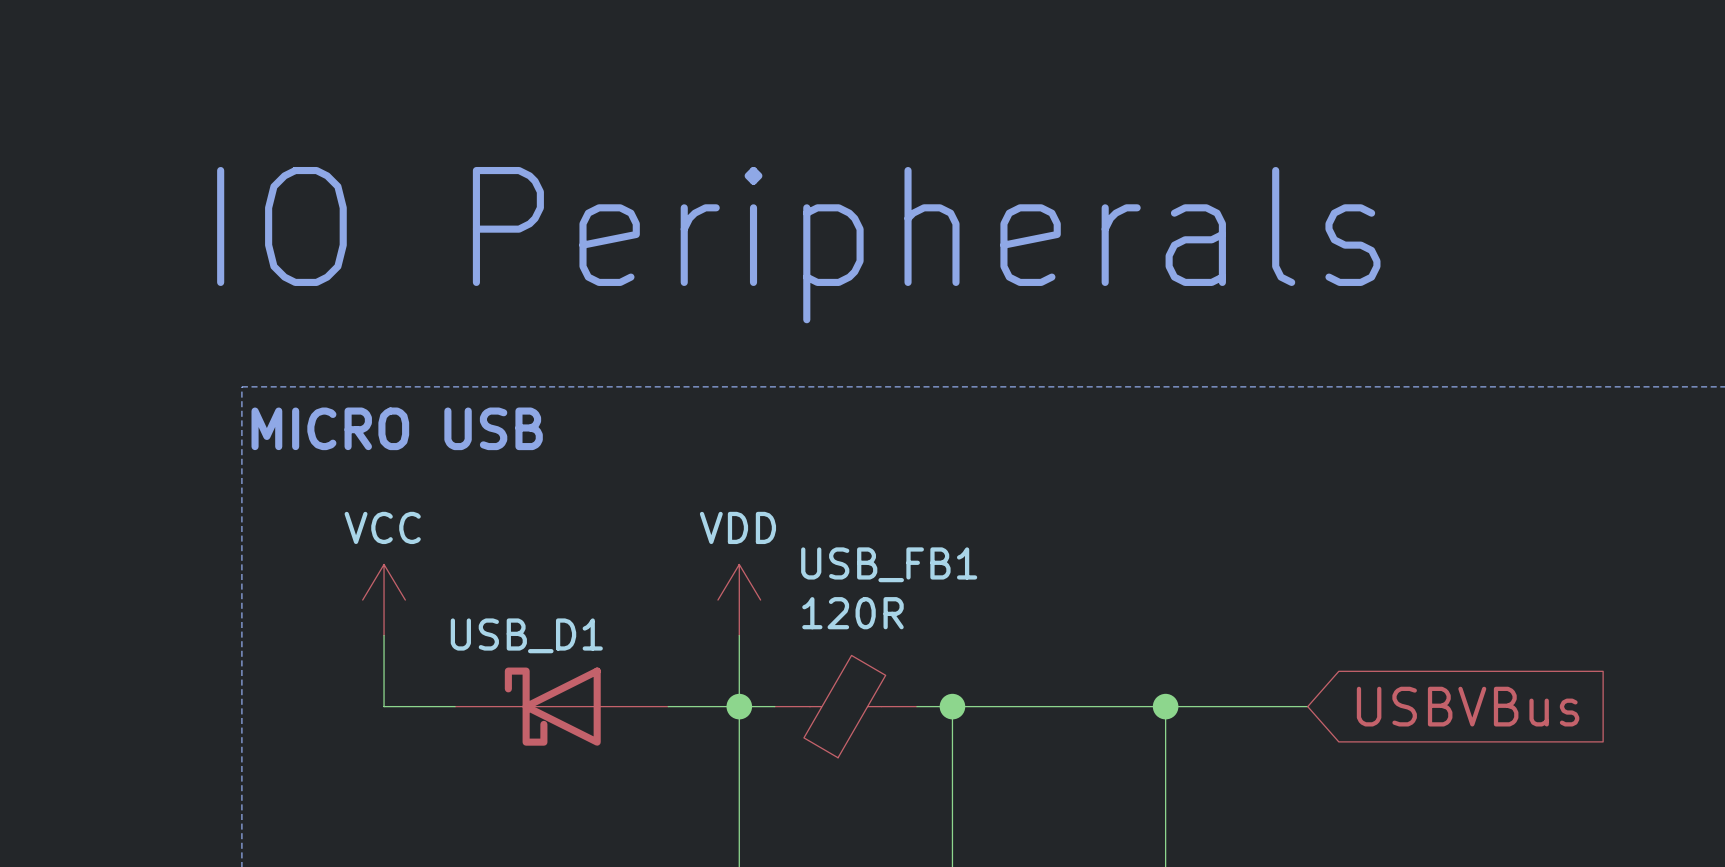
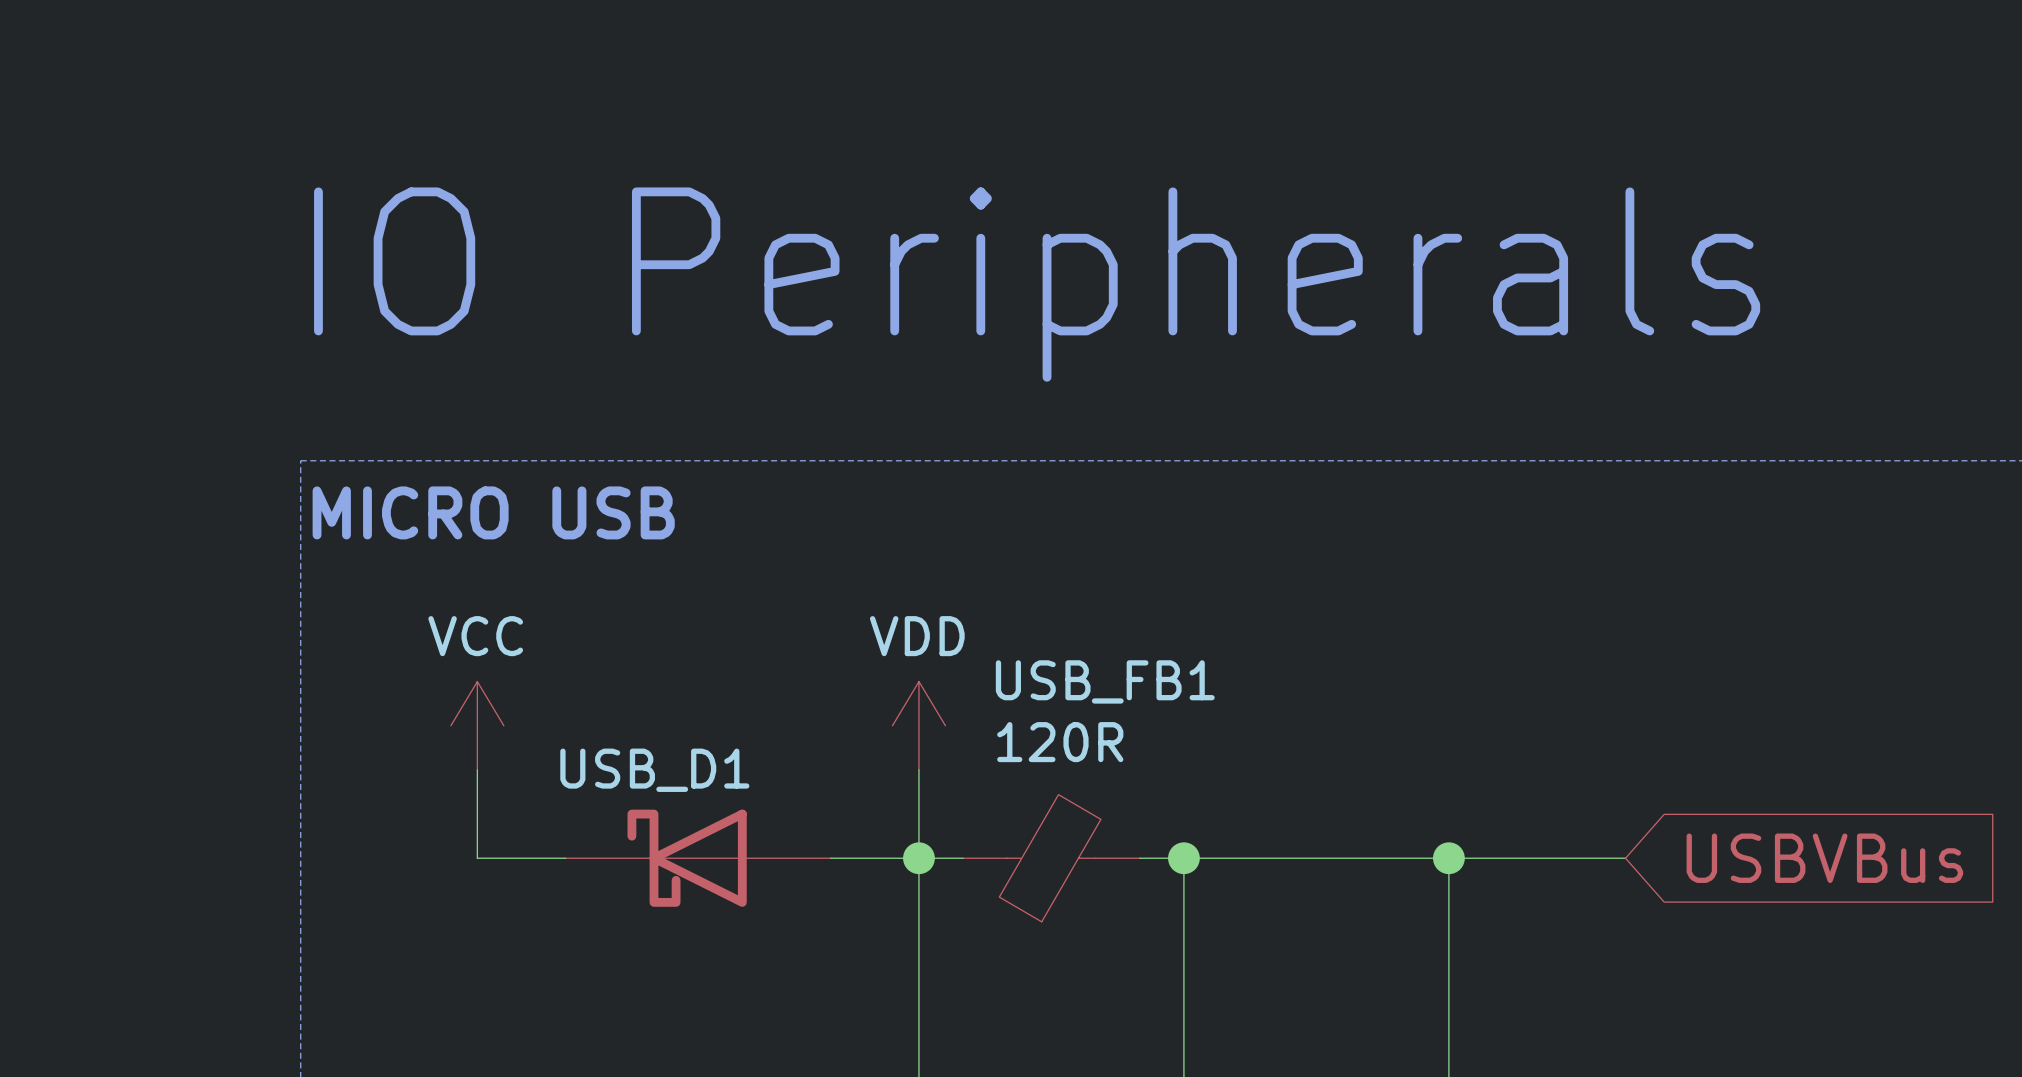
text position: IO Peripherals (798, 245) -> IO Peripherals (1037, 284)

